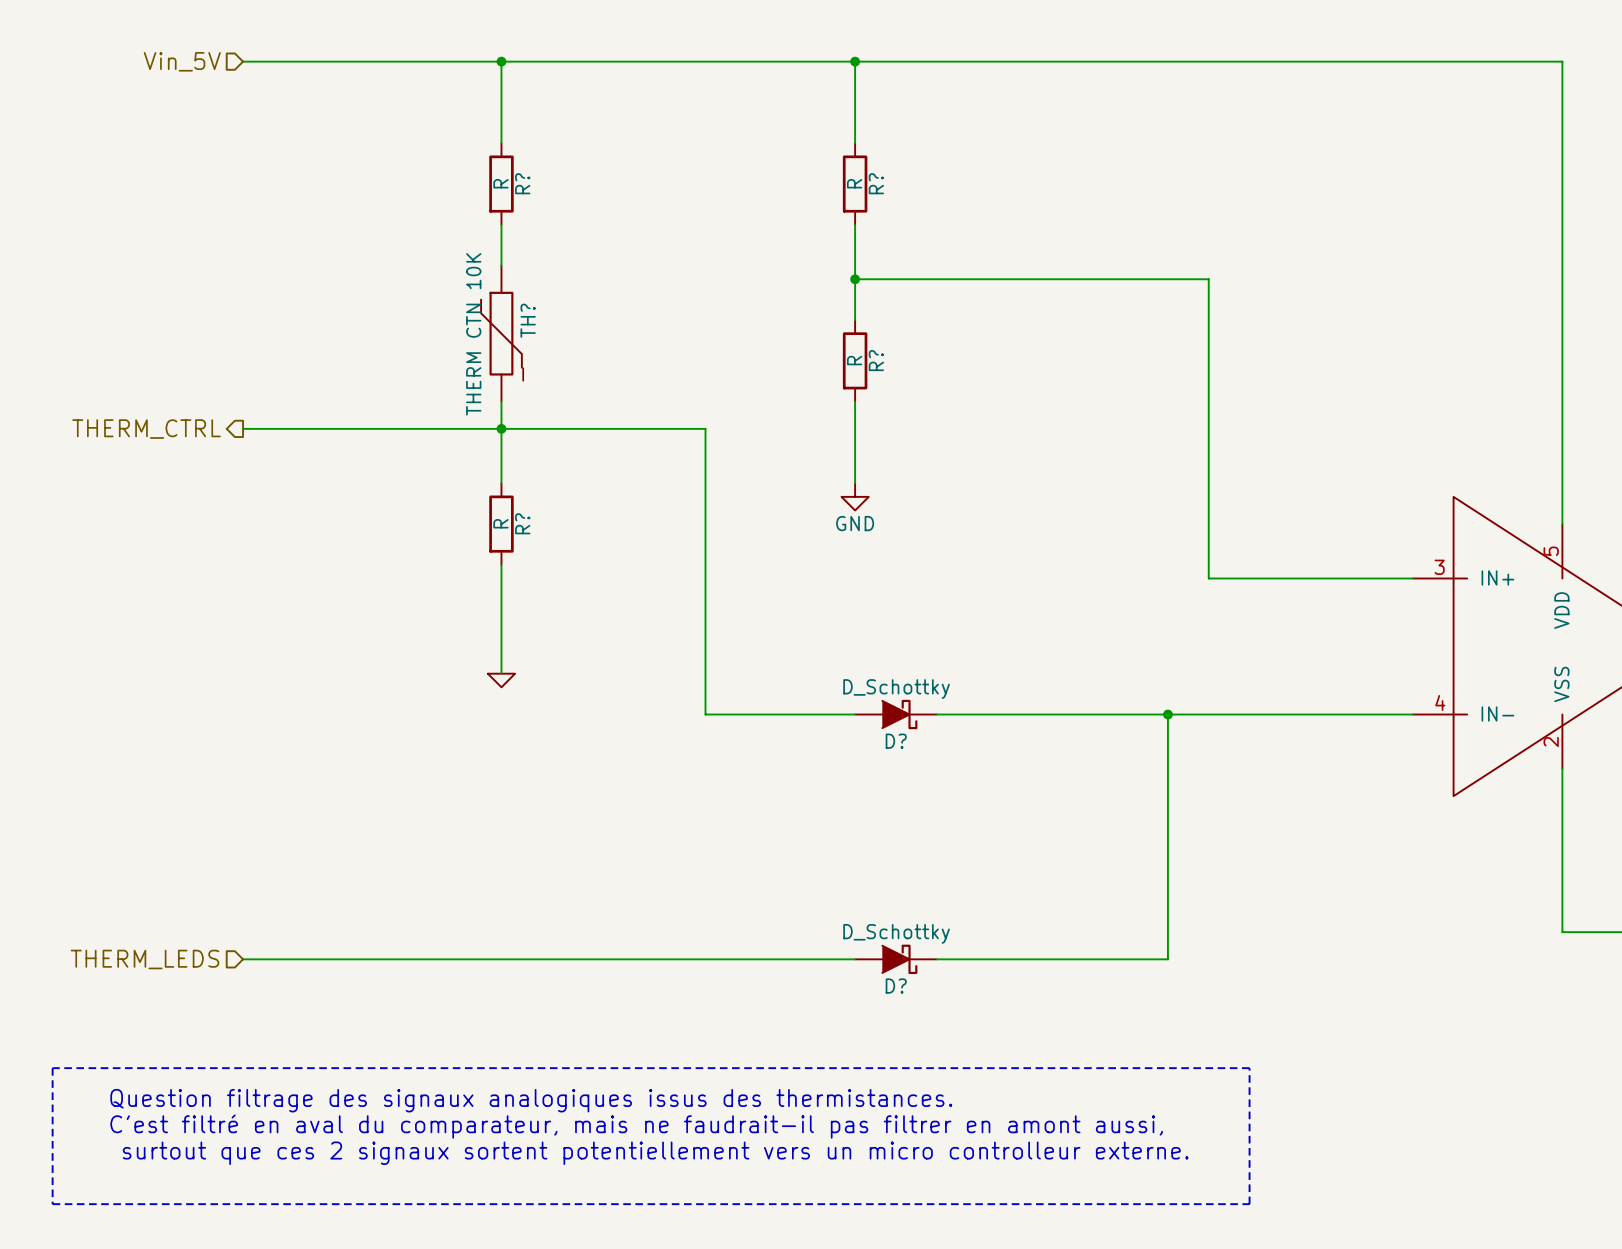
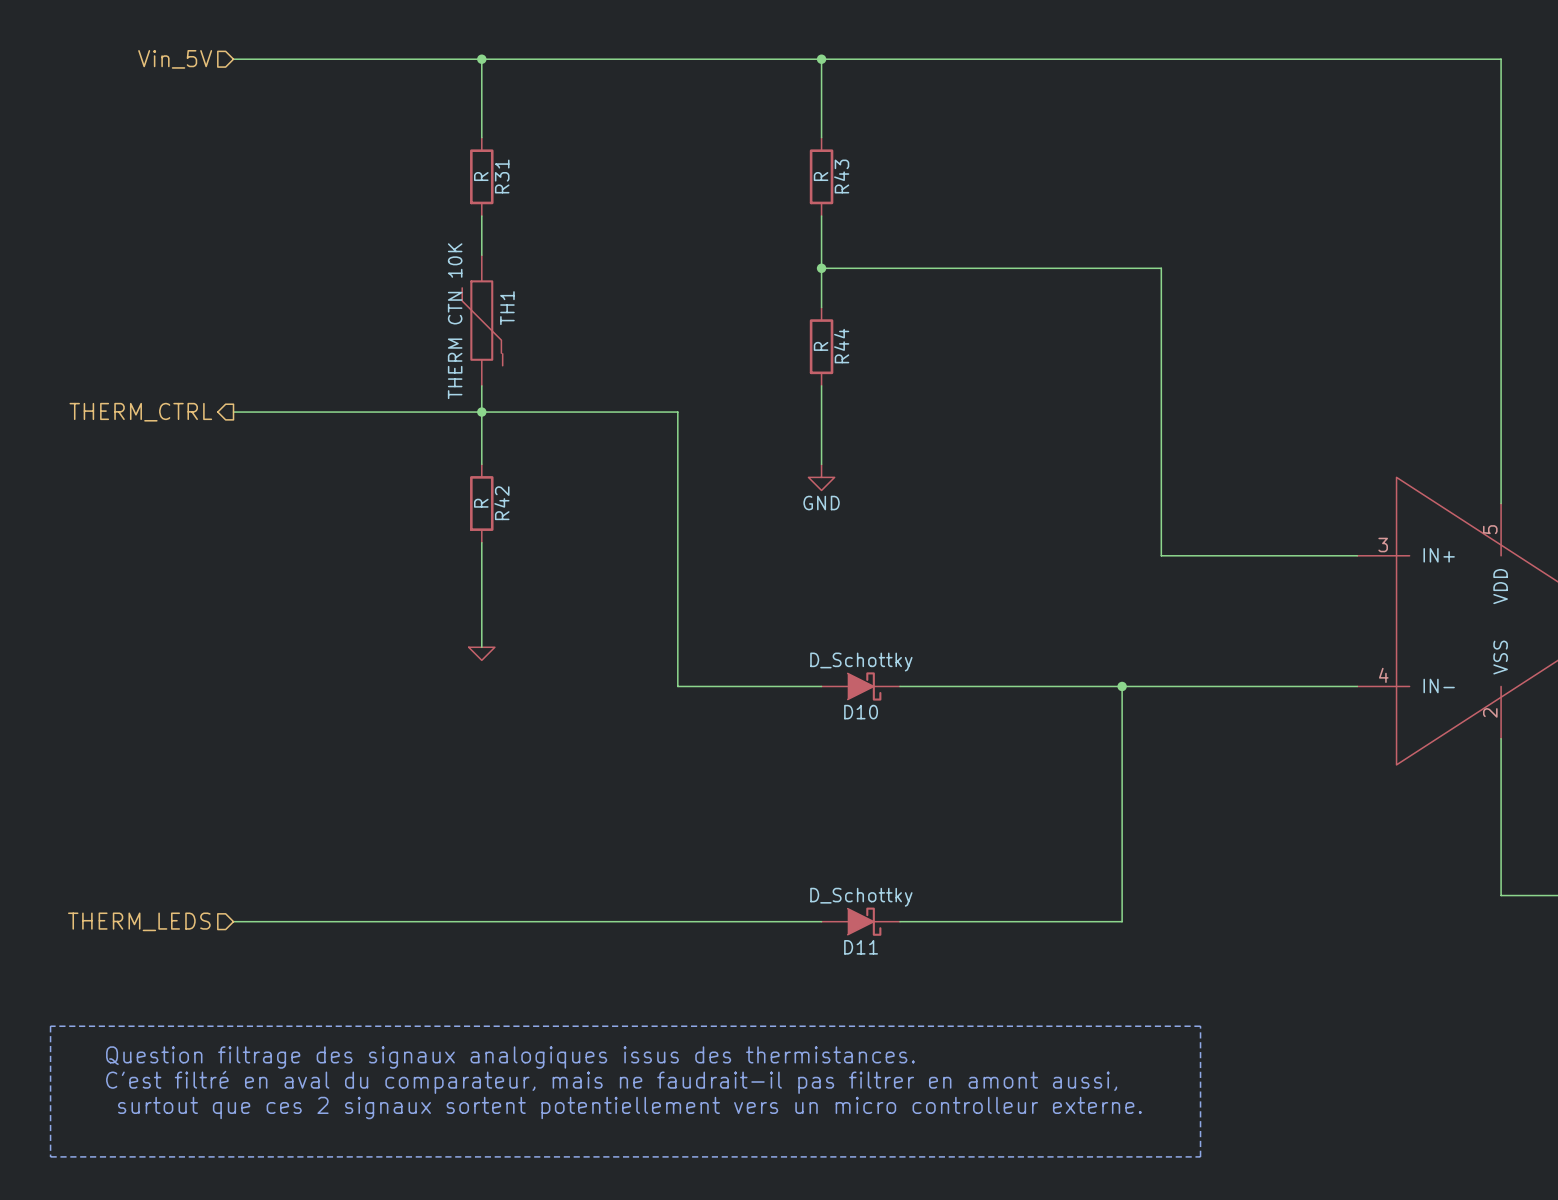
R? name: R? (522, 183) -> R31 (502, 176)
R? name: R? (876, 183) -> R43 (841, 176)
TH? name: TH? (528, 320) -> TH1 (507, 308)
R? name: R? (876, 360) -> R44 (841, 346)
R? name: R? (522, 523) -> R42 (501, 503)
D? name: D? (896, 741) -> D10 (861, 712)
D? name: D? (896, 986) -> D11 (861, 947)

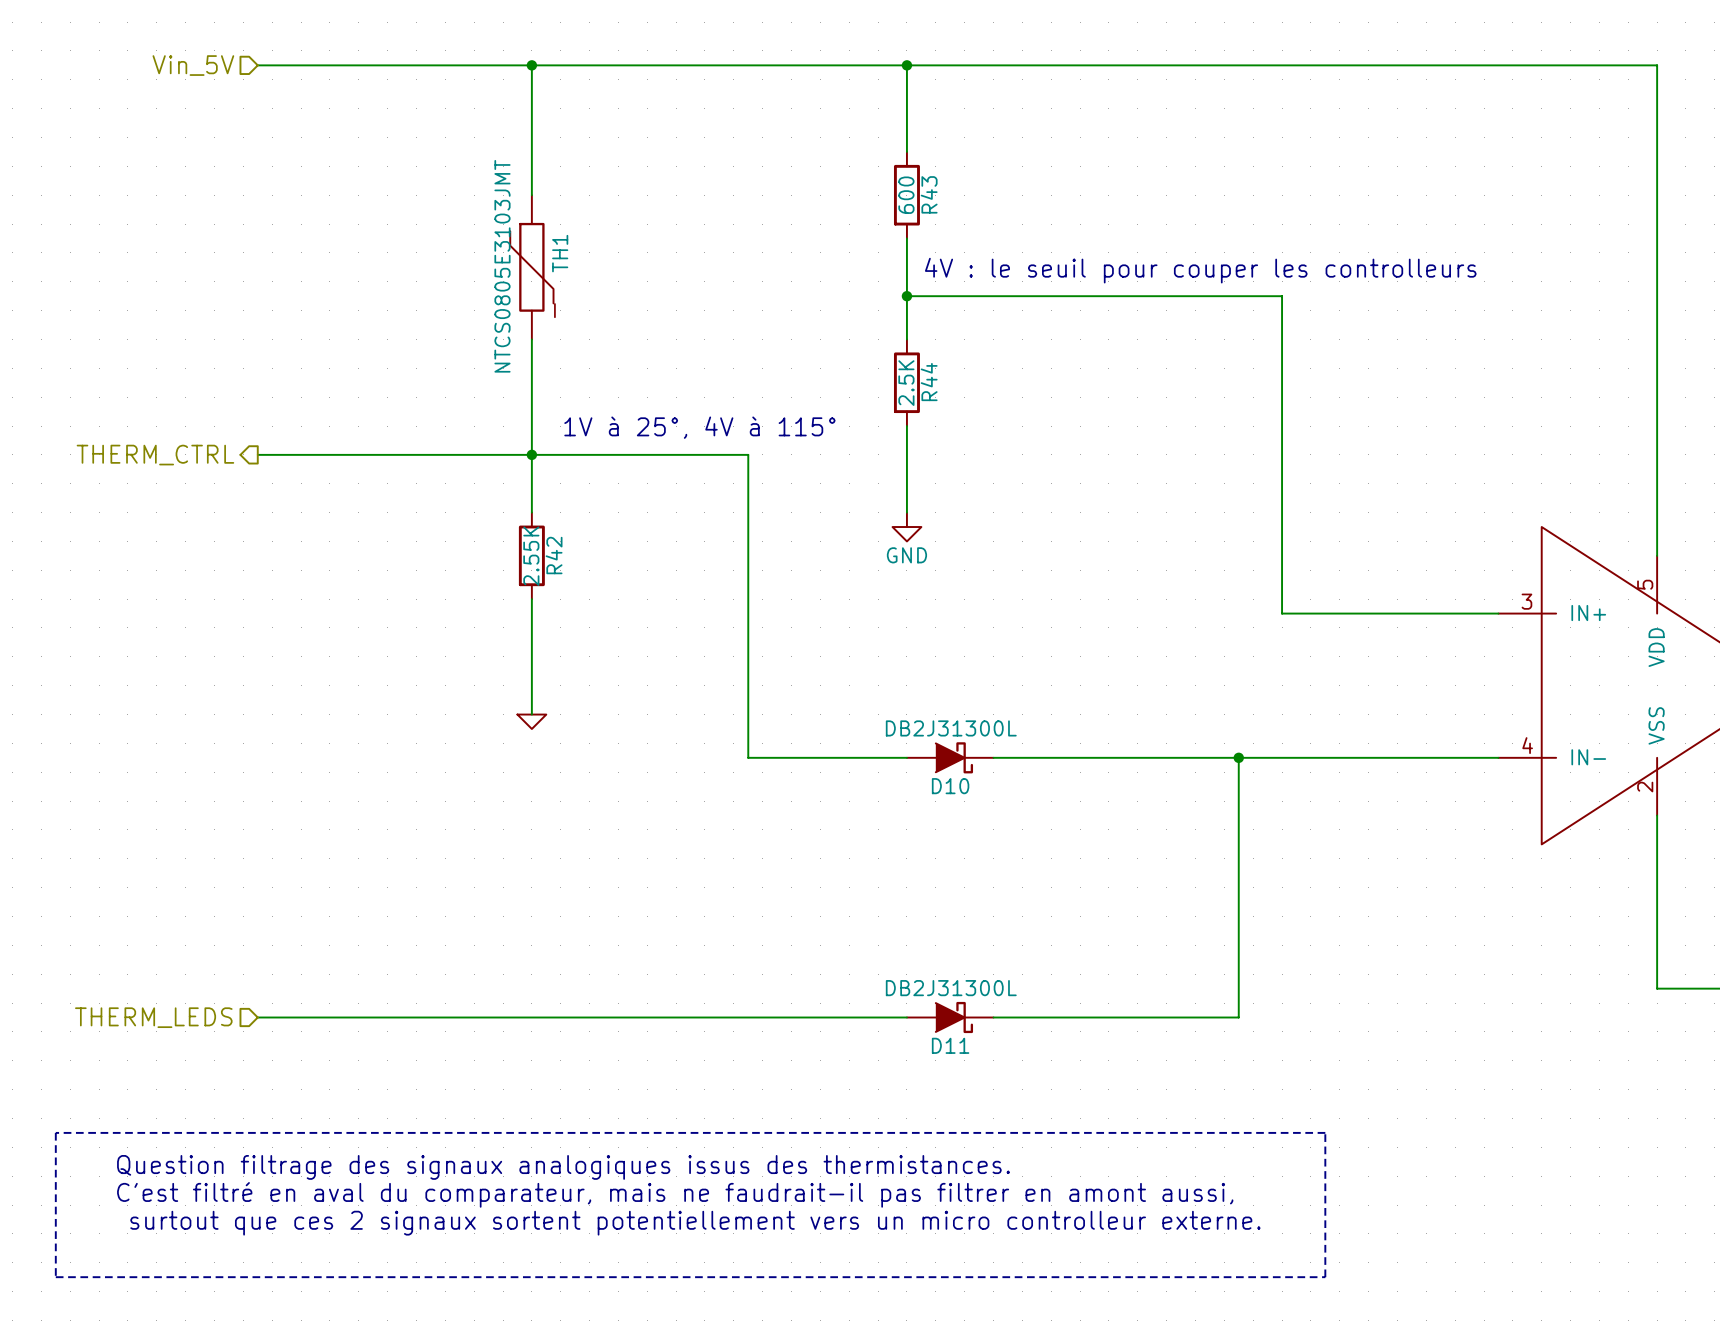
R31: R (481, 176) -> none
R43 value: R (821, 176) -> 600 (906, 195)
wire: (481, 216) (481, 255) -> (531, 151) (531, 195)
text: none -> 4V : le seuil pour couper les controlleurs (1200, 270)
wire: none -> (531, 339) (531, 426)
TH1 position: (481, 320) -> (531, 267)
TH1 value: THERM CTN 10K (455, 321) -> NTCS0805E3103JMT (502, 266)
R44 value: R (821, 346) -> 2.5K (906, 383)
text: none -> 1V à 25°, 4V à 115° (699, 427)
R42 value: R (481, 503) -> 2.55K (531, 556)
D10 value: D_Schottky (861, 662) -> DB2J31300L (951, 728)
D11 value: D_Schottky (861, 897) -> DB2J31300L (951, 988)

